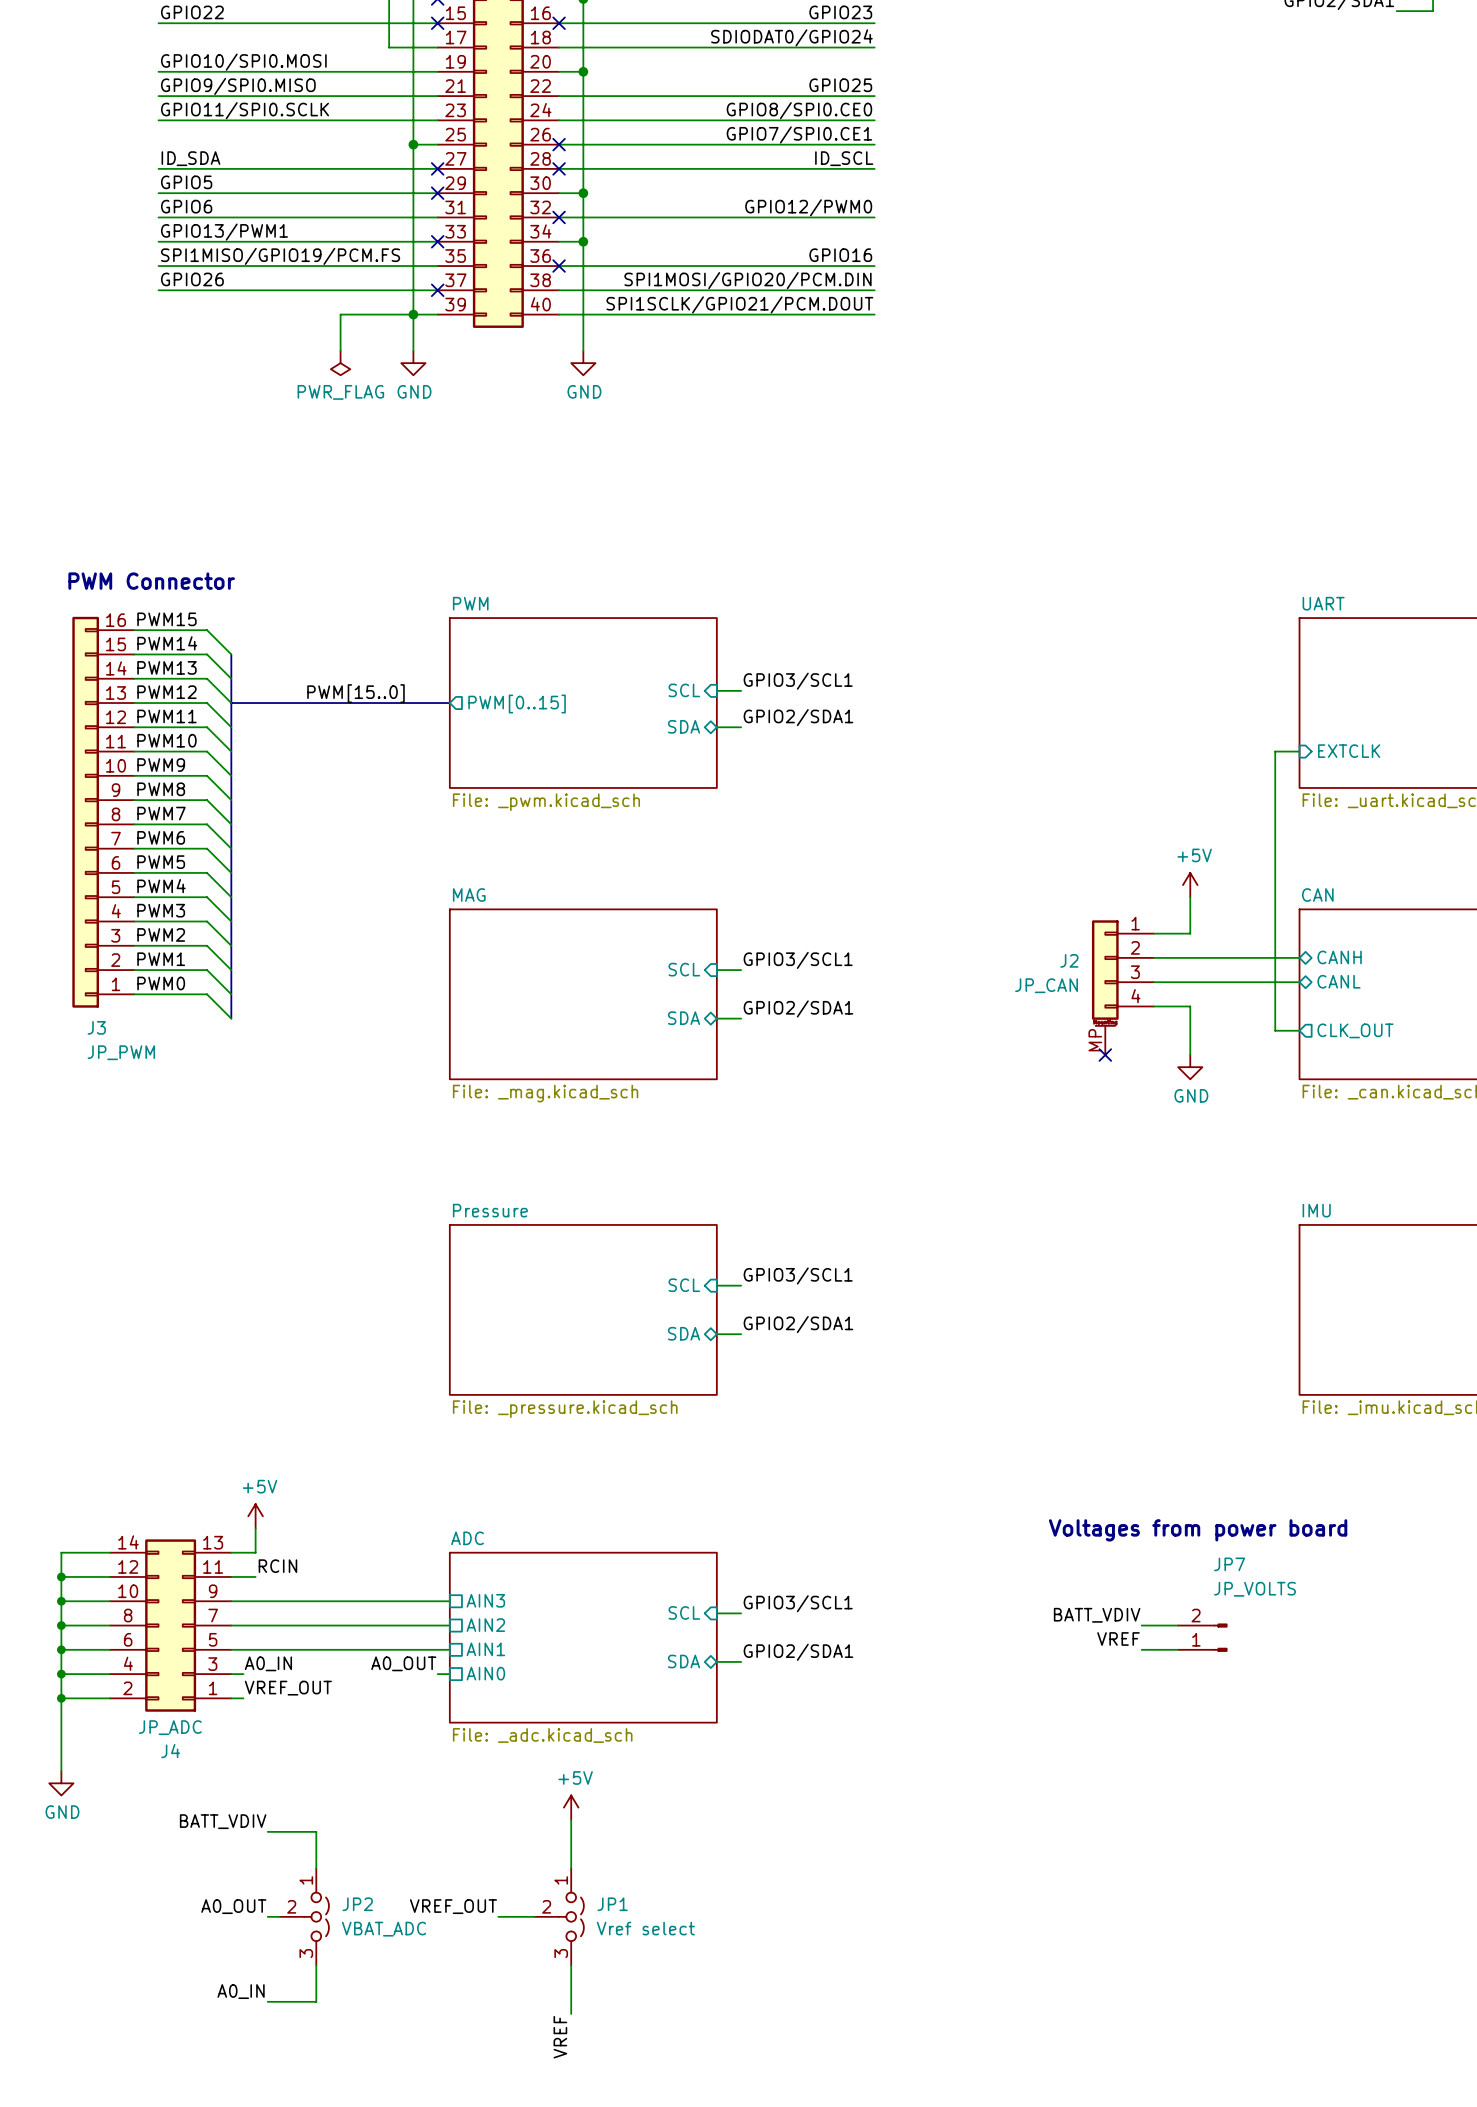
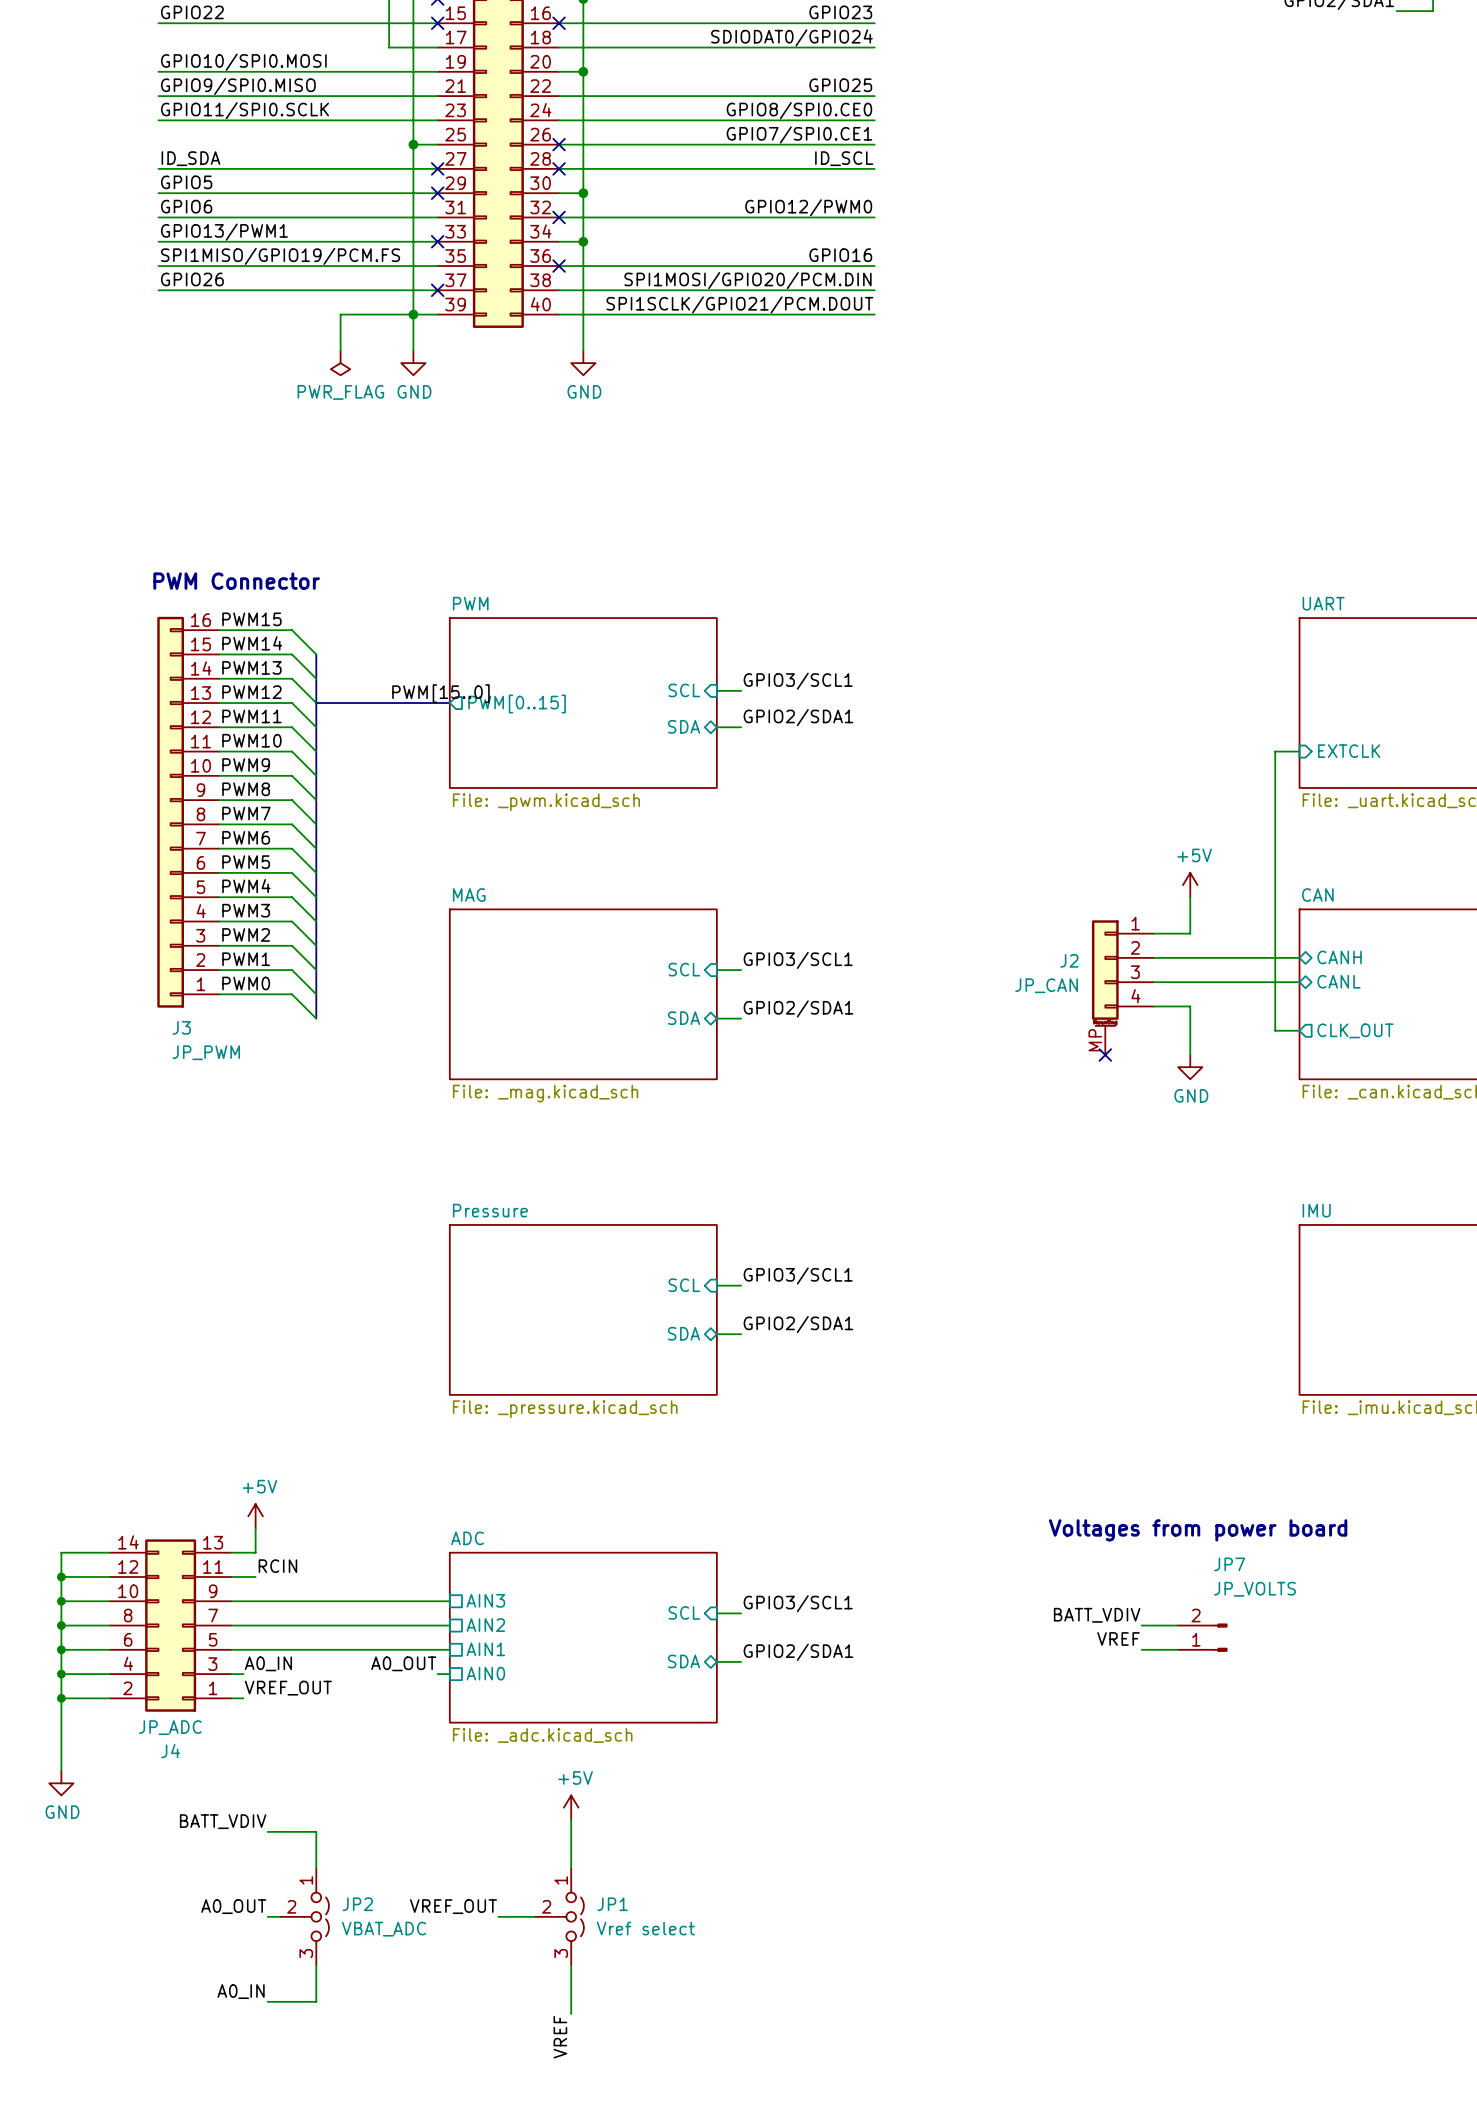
text position: PWM Connector (151, 581) -> PWM Connector (236, 581)
label position: PWM15 (166, 619) -> PWM15 (251, 619)
wire: (134, 630) (207, 630) (231, 654) -> (219, 630) (292, 630) (316, 654)
label position: PWM14 (167, 643) -> PWM14 (252, 643)
wire: (134, 654) (207, 654) (231, 678) -> (219, 654) (292, 654) (316, 678)
bus: (231, 654) (231, 1018) -> (316, 654) (316, 1018)
label position: PWM13 (166, 667) -> PWM13 (251, 667)
wire: (134, 678) (207, 678) (231, 703) -> (219, 678) (292, 678) (316, 703)
label position: PWM12 (166, 692) -> PWM12 (251, 692)
label position: PWM[15..0] (355, 693) -> PWM[15..0] (440, 693)
wire: (134, 703) (207, 703) (231, 727) -> (219, 703) (292, 703) (316, 727)
bus: (231, 703) (316, 703) -> none
label position: PWM11 (166, 716) -> PWM11 (251, 716)
wire: (134, 727) (207, 727) (231, 751) -> (219, 727) (292, 727) (316, 751)
label position: PWM10 (166, 740) -> PWM10 (251, 740)
wire: (134, 751) (207, 751) (231, 775) -> (219, 751) (292, 751) (316, 775)
label position: PWM9 (161, 765) -> PWM9 (246, 765)
wire: (134, 775) (207, 775) (231, 800) -> (219, 775) (292, 775) (316, 800)
label position: PWM8 (161, 789) -> PWM8 (246, 789)
wire: (134, 800) (207, 800) (231, 824) -> (219, 800) (292, 800) (316, 824)
J3 position: (103, 812) -> (188, 812)
label position: PWM7 (161, 813) -> PWM7 (246, 813)
wire: (134, 824) (207, 824) (231, 848) -> (219, 824) (292, 824) (316, 848)
label position: PWM6 (161, 837) -> PWM6 (246, 837)
wire: (134, 848) (207, 848) (231, 872) -> (219, 848) (292, 848) (316, 872)
label position: PWM5 (161, 862) -> PWM5 (246, 862)
wire: (134, 872) (207, 872) (231, 897) -> (219, 872) (292, 872) (316, 897)
label position: PWM4 (161, 886) -> PWM4 (246, 886)
wire: (134, 897) (207, 897) (231, 921) -> (219, 897) (292, 897) (316, 921)
label position: PWM3 (161, 910) -> PWM3 (246, 910)
wire: (134, 921) (207, 921) (231, 945) -> (219, 921) (292, 921) (316, 945)
label position: PWM2 (161, 934) -> PWM2 (246, 934)
wire: (134, 945) (207, 945) (231, 970) -> (219, 945) (292, 945) (316, 970)
label position: PWM1 (161, 959) -> PWM1 (246, 959)
wire: (134, 970) (207, 970) (231, 994) -> (219, 970) (292, 970) (316, 994)
label position: PWM0 (161, 983) -> PWM0 (246, 983)
wire: (134, 994) (207, 994) (231, 1018) -> (219, 994) (292, 994) (316, 1018)

